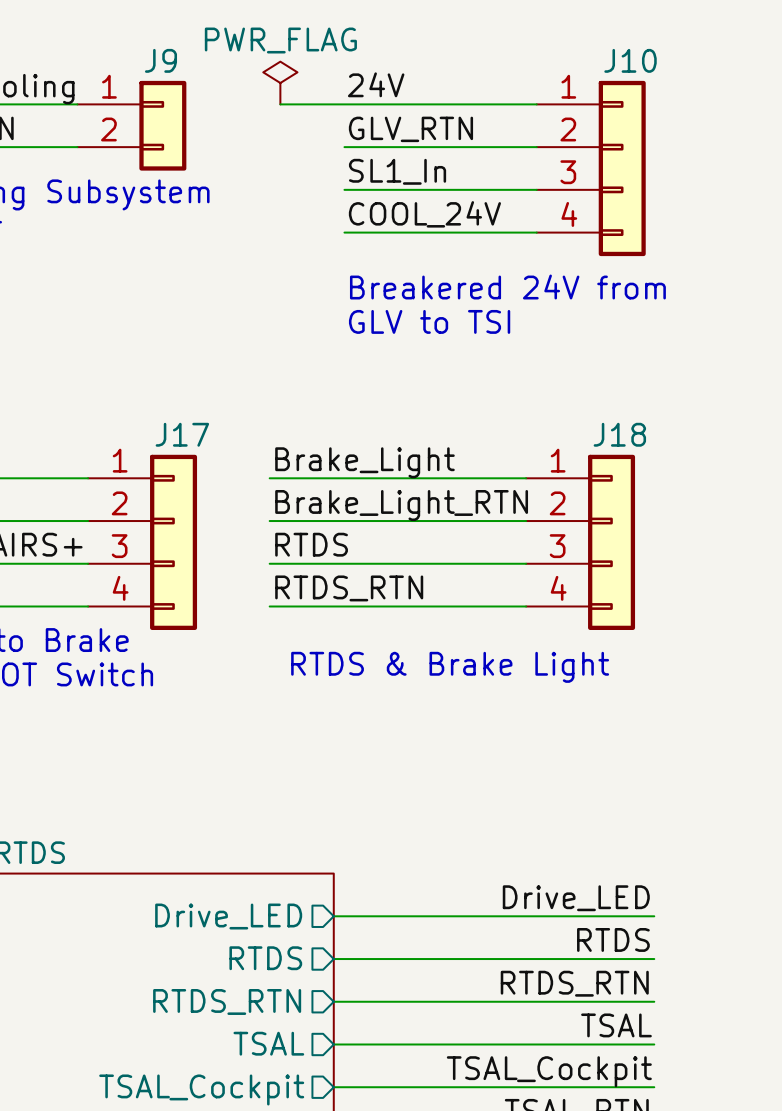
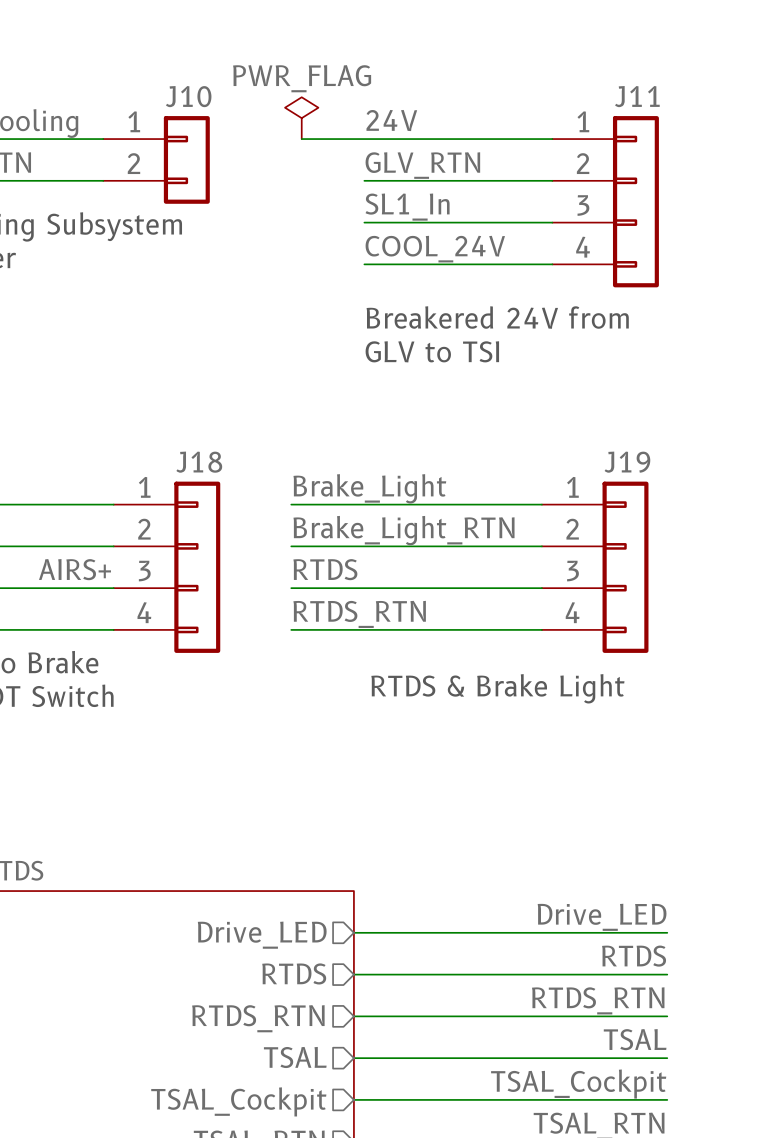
J9 name: J9 (160, 60) -> J10 (188, 96)
J10 name: J10 (630, 60) -> J11 (637, 96)
J17 name: J17 (182, 434) -> J18 (199, 462)
J18 name: J18 (619, 434) -> J19 (627, 462)

